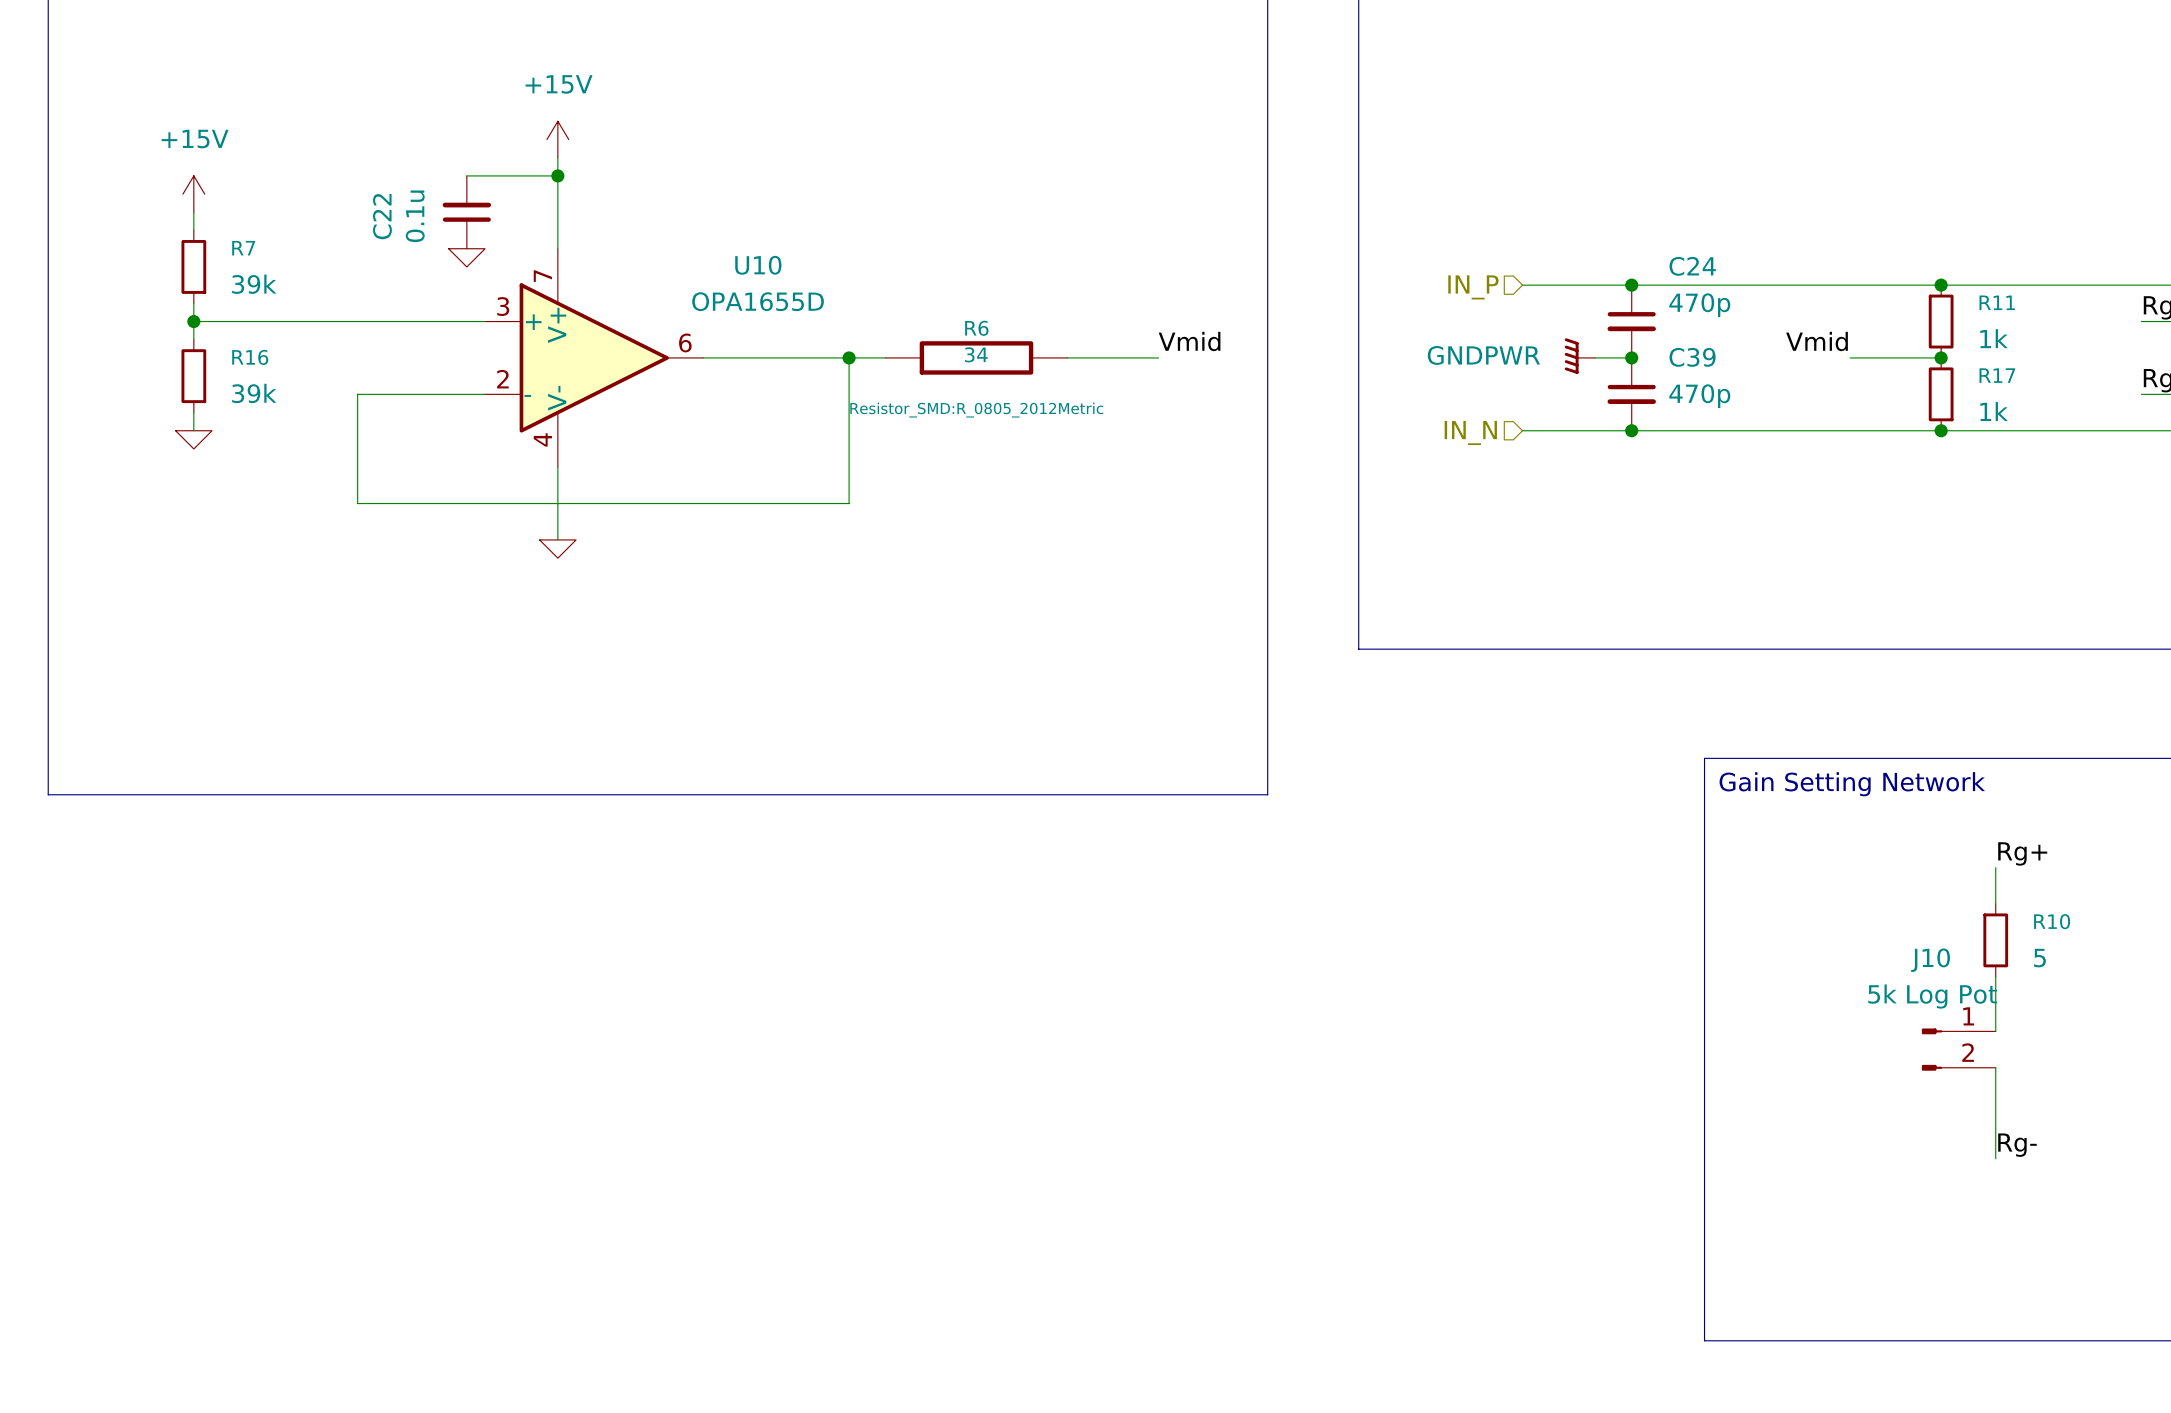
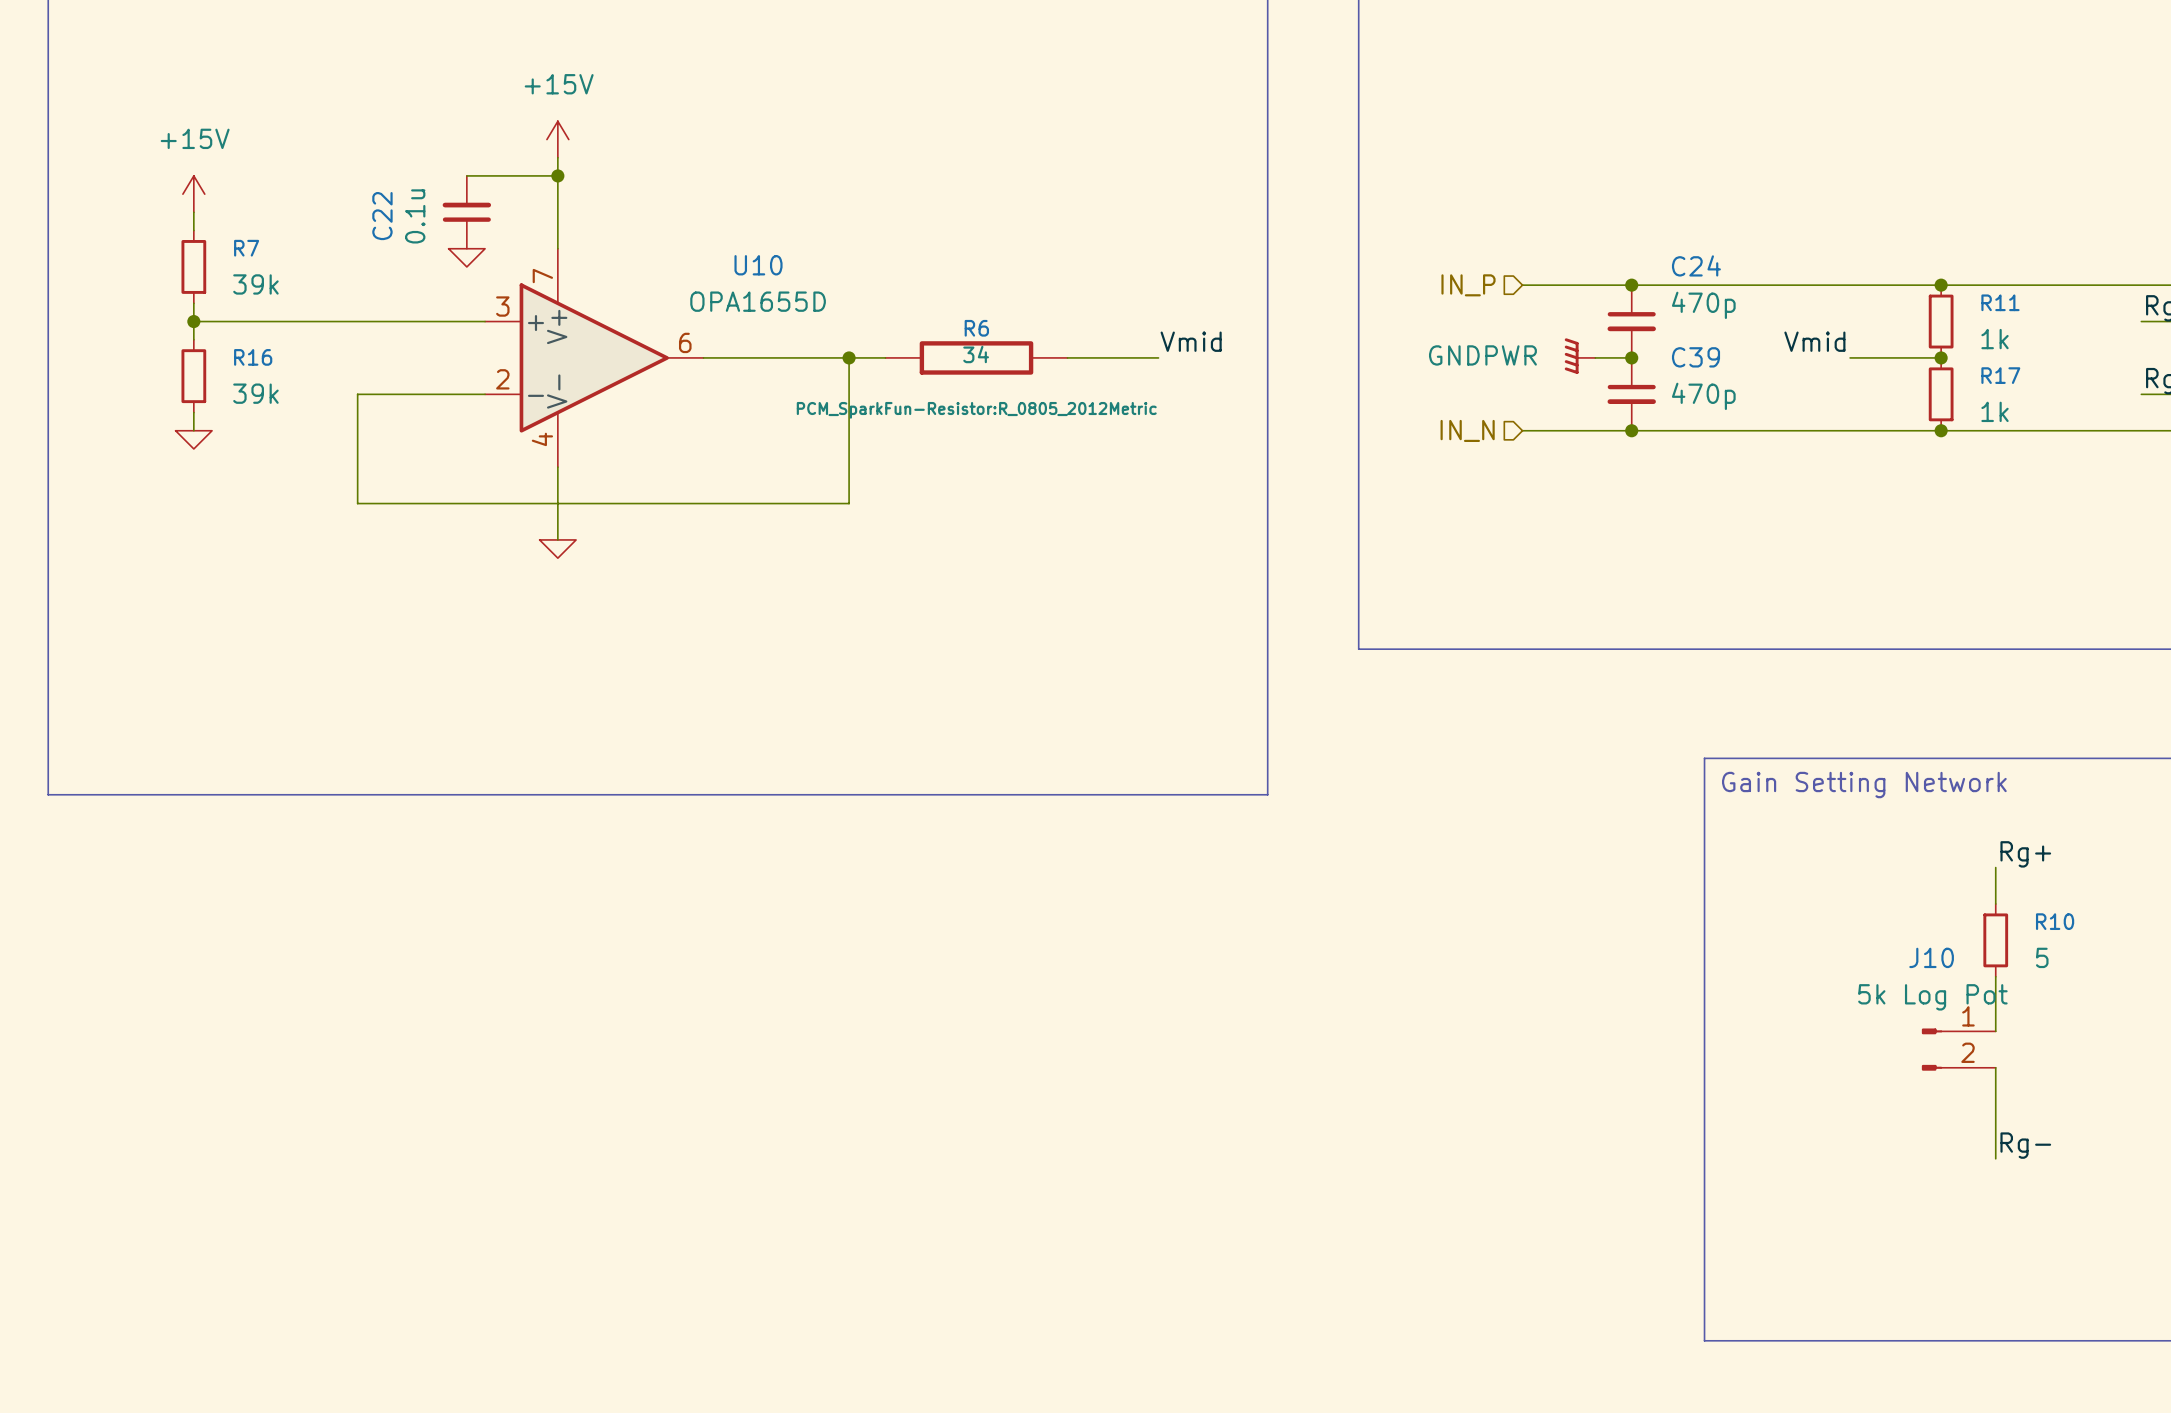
R6 text: Resistor_SMD:R_0805_2012Metric (976, 410) -> PCM_SparkFun-Resistor:R_0805_2012Metric (976, 410)

